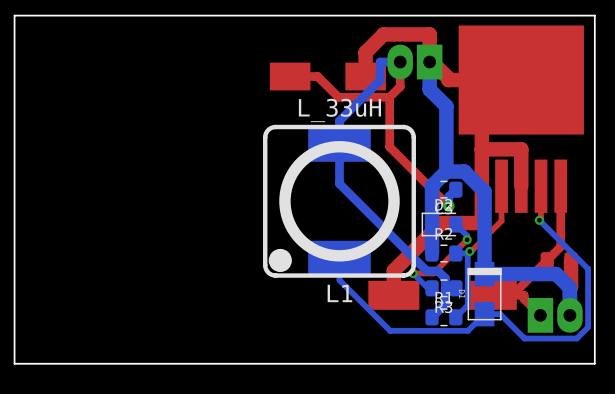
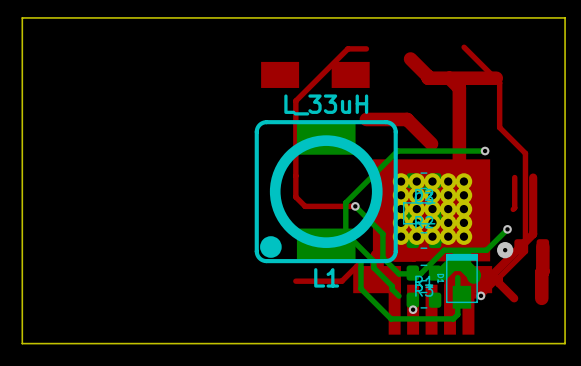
top track: none -> (464, 47) (499, 82) (499, 127) (525, 153) (525, 251) (481, 295) (468, 295) (468, 309)
top track: none -> (366, 48) (347, 48) (295, 100) (295, 197) (305, 206) (355, 206)
top track: (400, 62) (400, 86) (389, 97) -> none
bottom track: (400, 62) (380, 62) (380, 80) (339, 120) (339, 183) (426, 270) (437, 270) (445, 278) (445, 303) (432, 317) -> none
part: (414, 62) -> none
top track: (429, 62) (429, 34) (383, 34) (365, 52) (365, 76) -> none
bottom track: (429, 62) (429, 89) (446, 106) (446, 171) -> none
top track: (290, 76) (317, 76) (338, 97) (389, 97) -> none
top track: (389, 97) (389, 146) (448, 206) -> none
part: (521, 119) -> none
top track: none -> (366, 119) (407, 119) (431, 143)
top track: (481, 149) (521, 149) (521, 186) -> none
bottom track: none -> (485, 151) (397, 151) (345, 202) (345, 233) (373, 261) (373, 267) (392, 286) (392, 289) (398, 296)
via: none -> (485, 151)
bottom track: (446, 171) (464, 171) (484, 191) (484, 274) (556, 274) (569, 287) (569, 315) -> none
bottom track: (446, 171) (432, 185) (432, 253) -> none
via: (448, 206) -> none
bottom track: none -> (355, 206) (382, 233) (382, 257) (398, 273) (420, 273) (444, 250) (486, 250) (507, 229)
via: none -> (355, 206)
bottom track: (539, 220) (588, 268) (588, 327) (576, 338) (524, 338) (500, 314) (484, 314) (467, 330) (390, 330) (339, 280) (339, 257) -> none
via position: (539, 220) -> (507, 229)
via: (467, 239) -> none
bottom track: (469, 251) (467, 253) (467, 305) (455, 317) -> none
via: (469, 251) -> none
part: none -> (431, 247)
via: none -> (505, 250)
bottom track: (413, 273) (428, 288) (432, 288) -> none
via: (413, 273) -> none
top track: none -> (360, 262) (341, 281) (295, 281)
bottom track: none -> (360, 262) (360, 288) (391, 318) (453, 318) (457, 314) (457, 277)
bottom track: none -> (442, 273) (452, 264) (463, 264) (473, 277)
via: none -> (481, 295)
part: (555, 315) -> none
via: none -> (413, 309)

